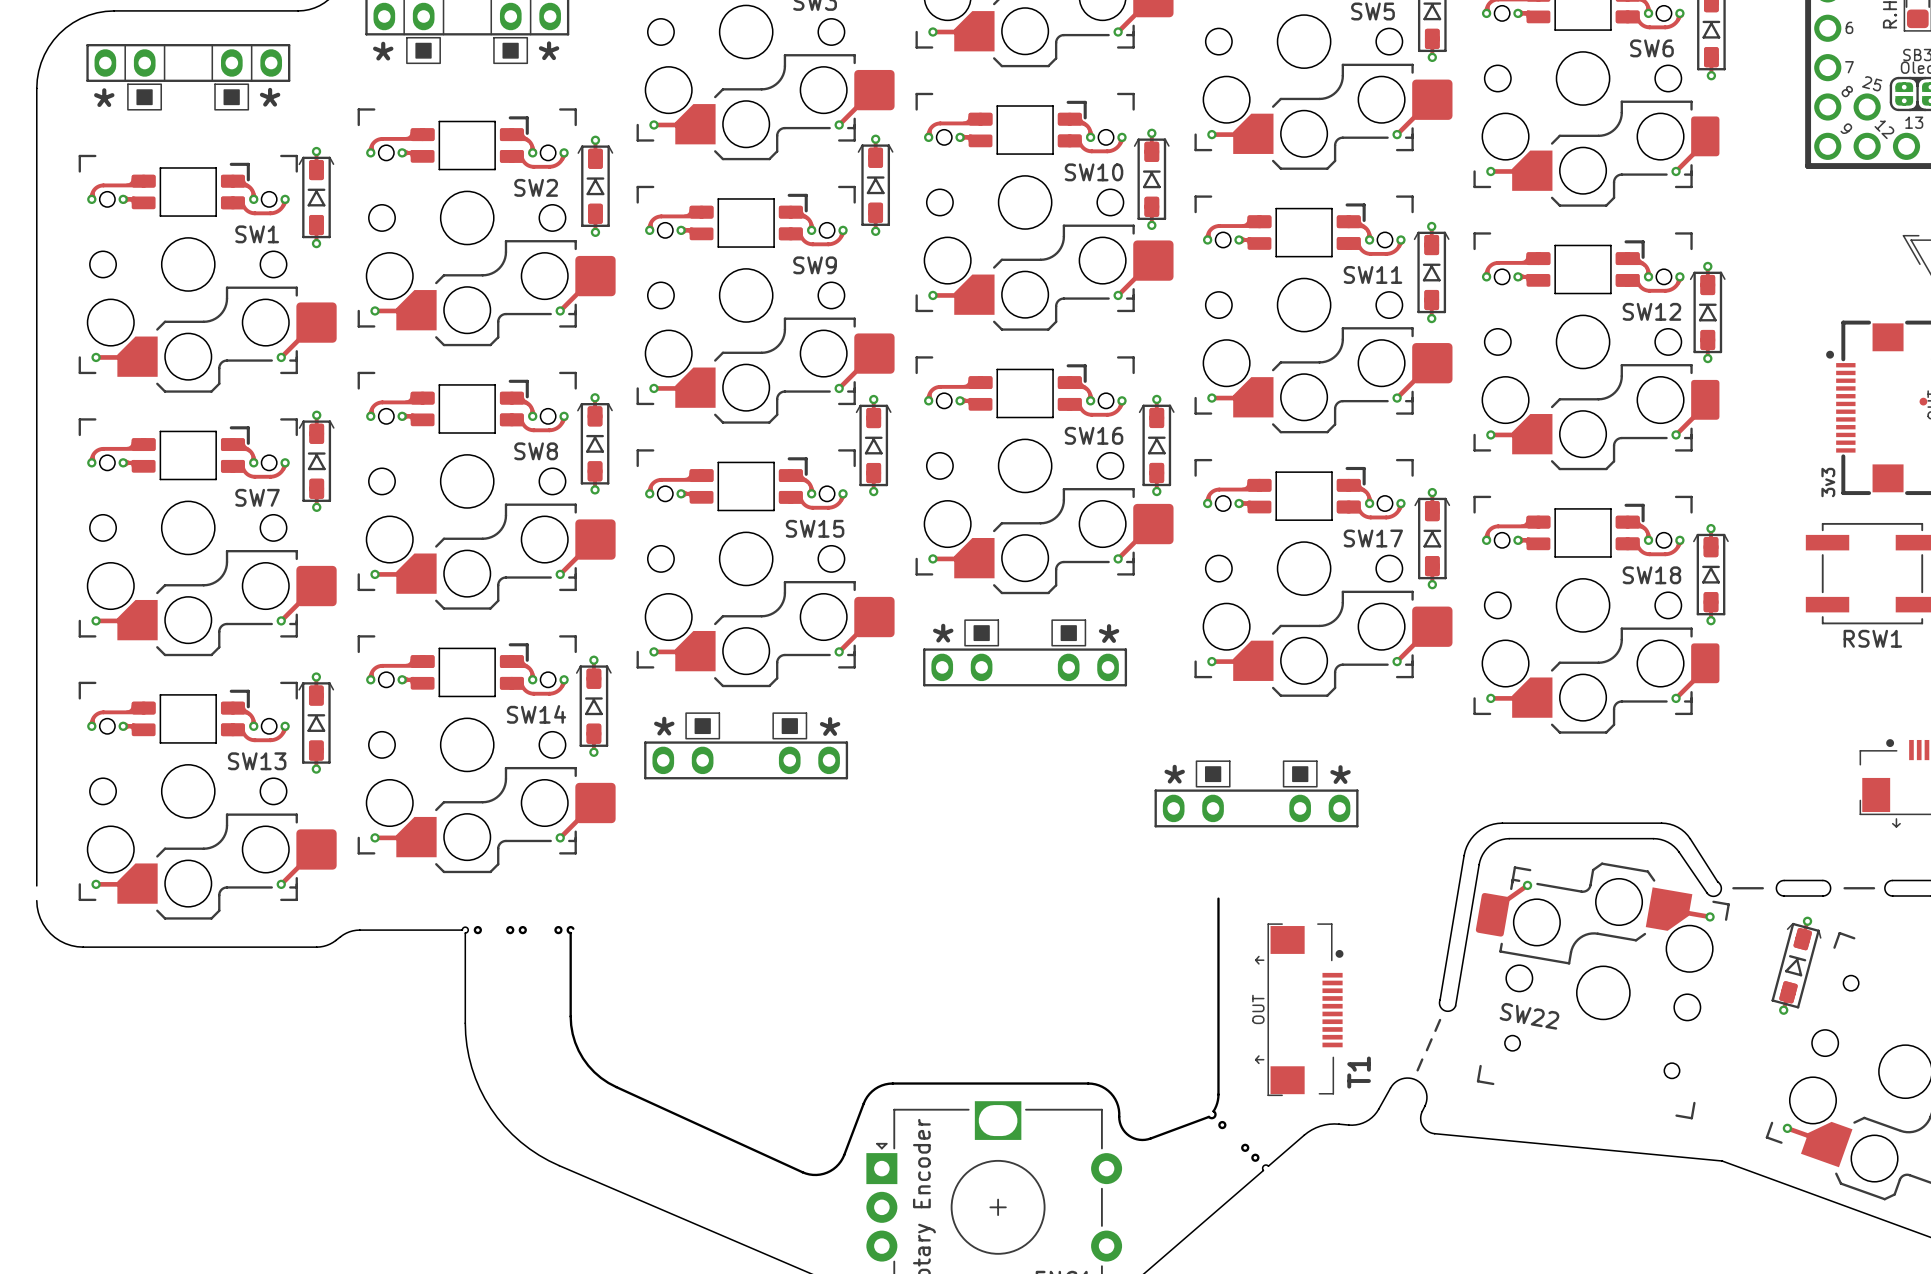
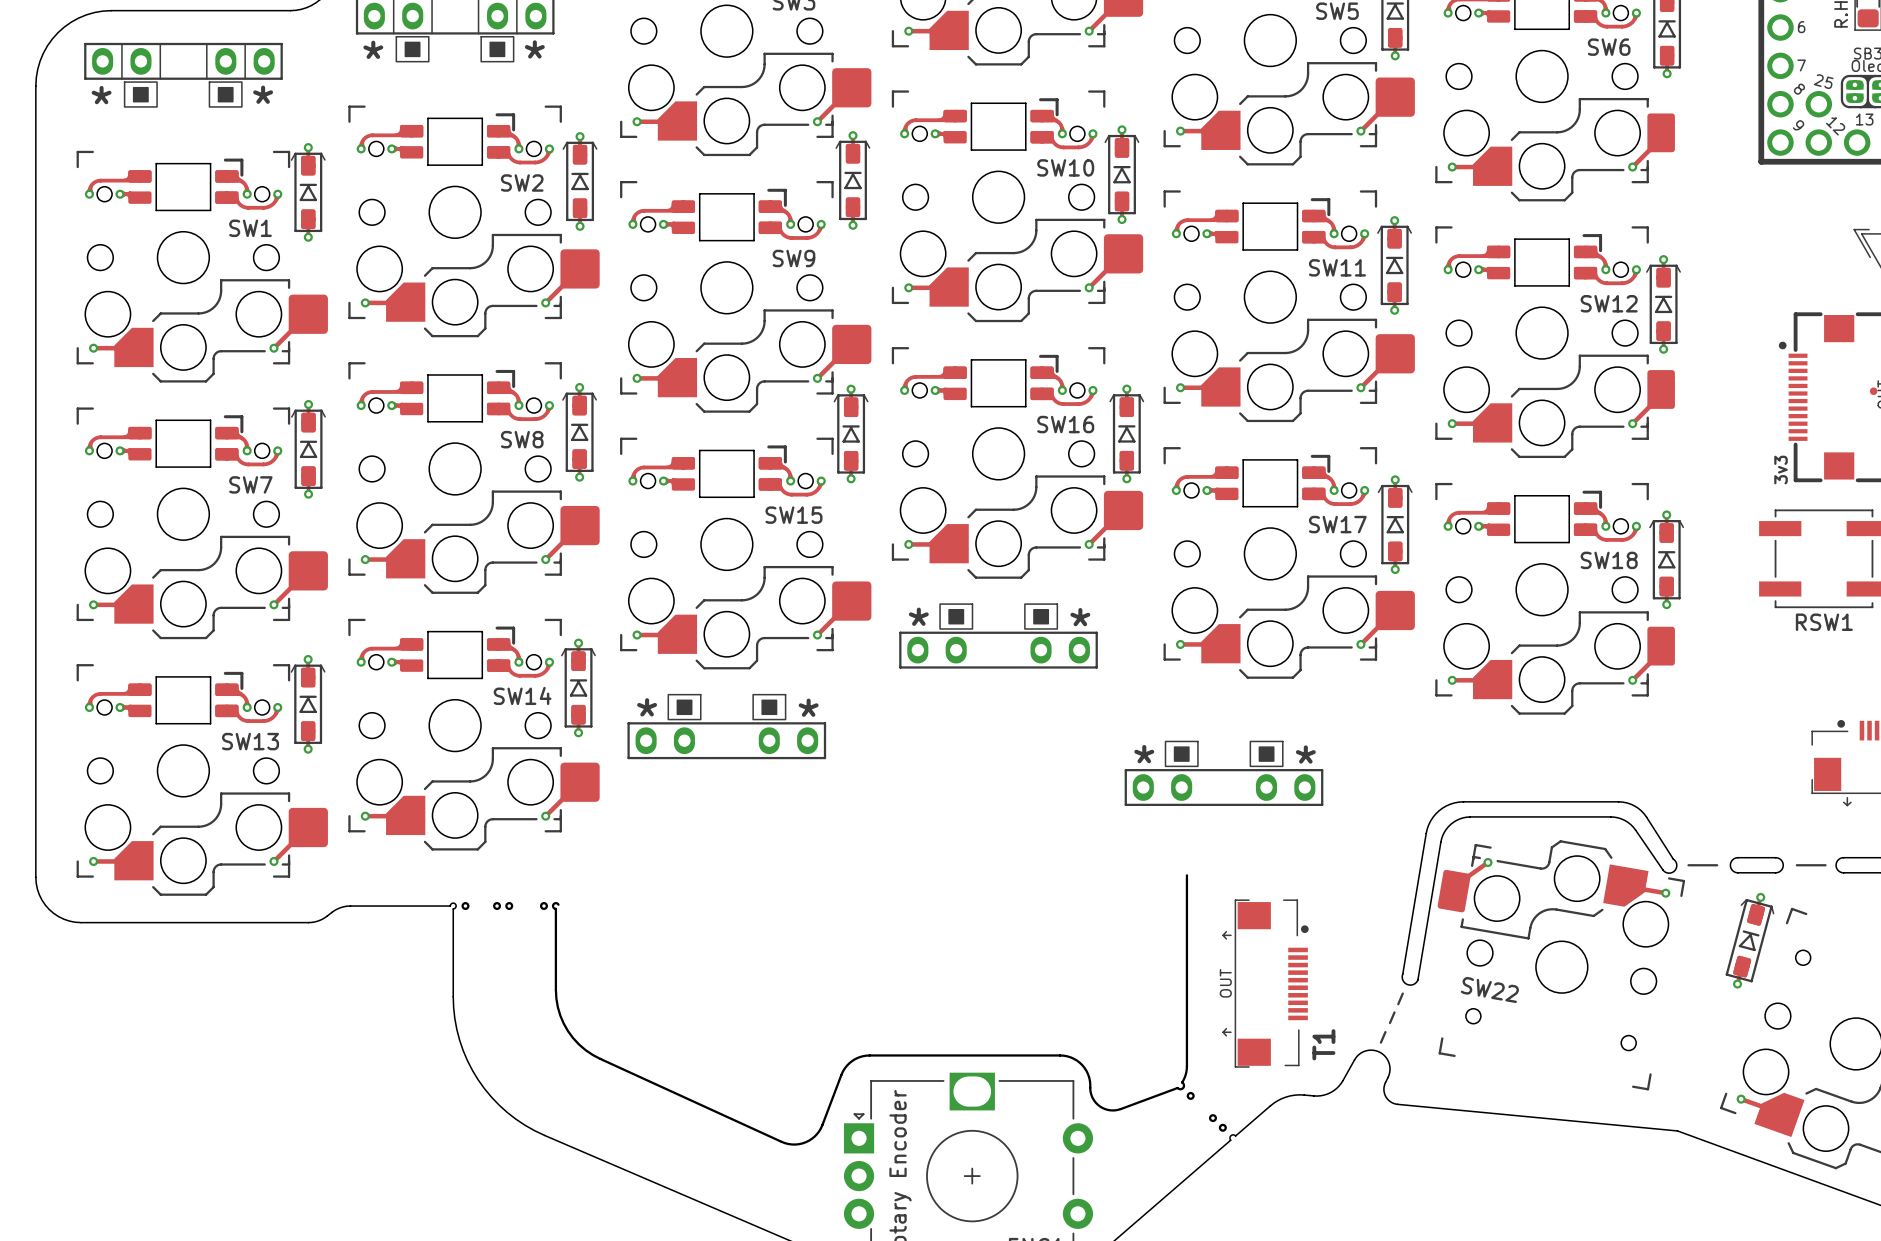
board edge: none -> (35, 862) (35, 877)

